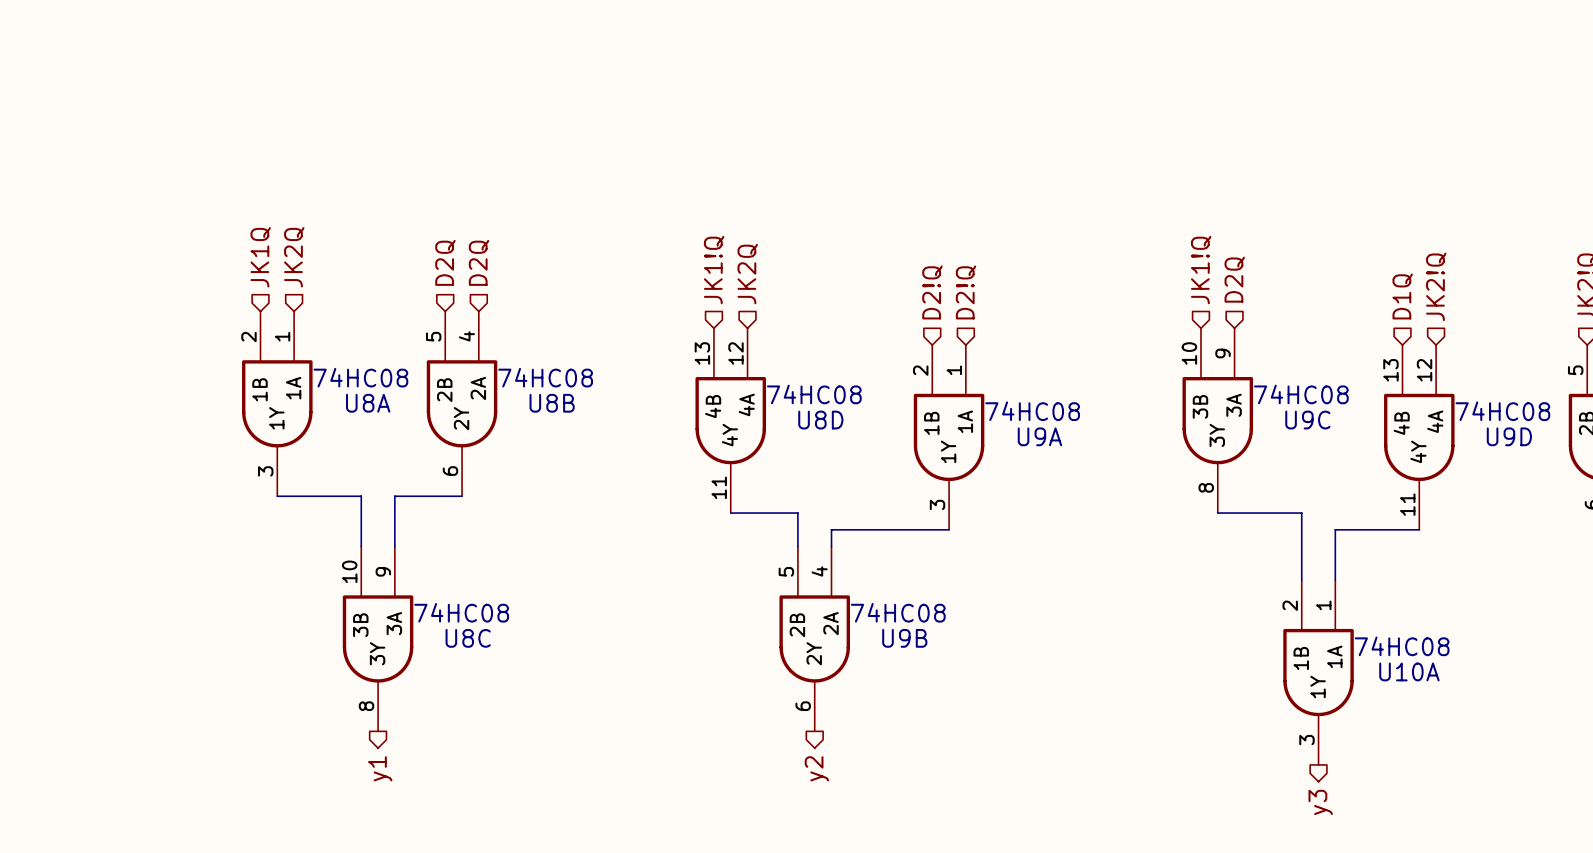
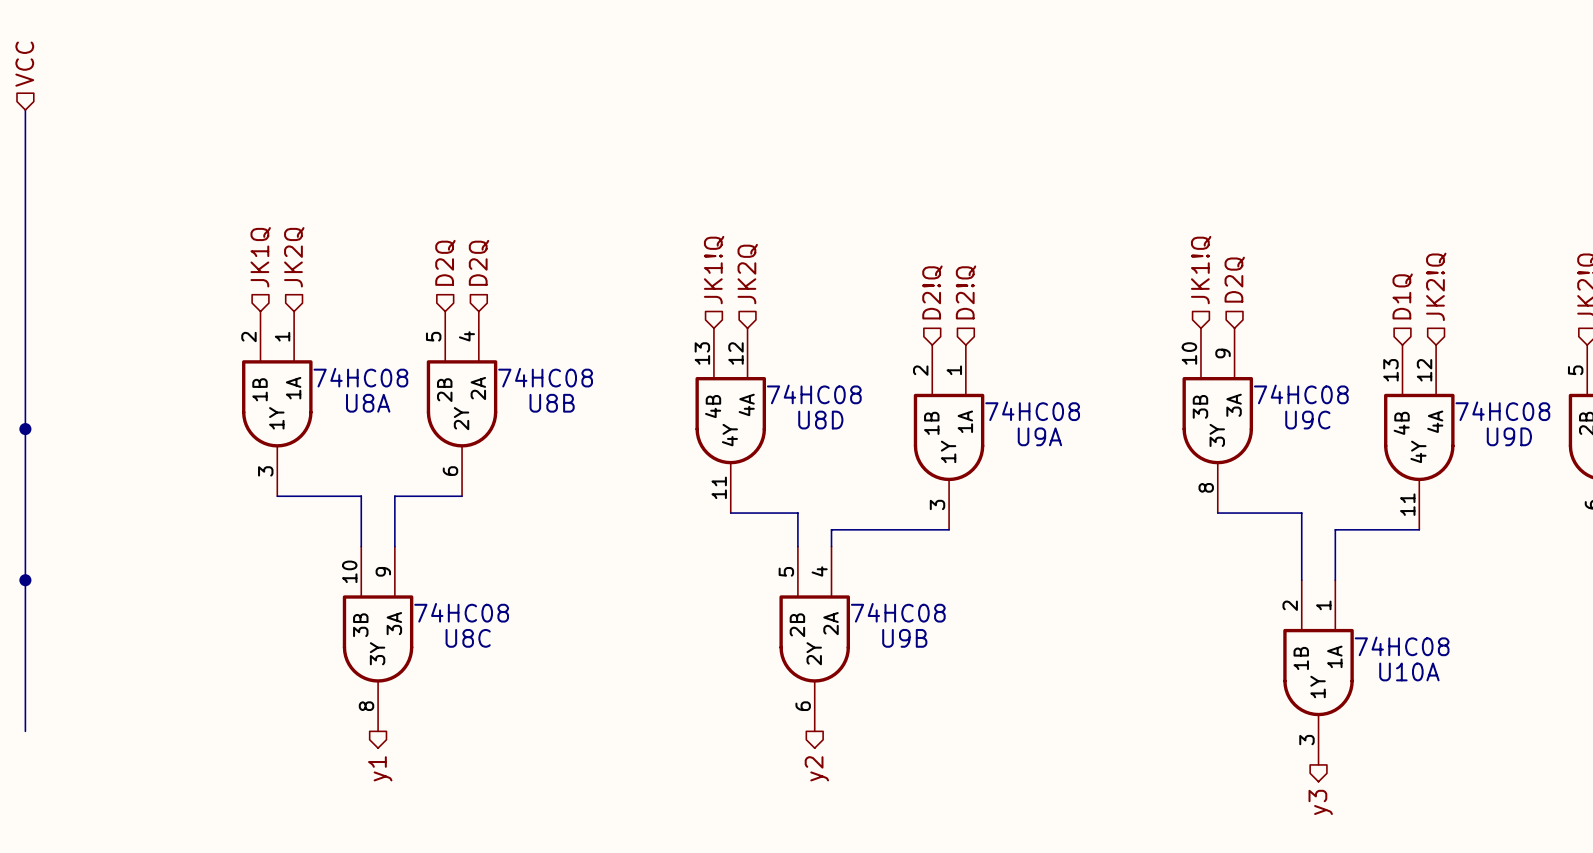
hierarchical label: none -> VCC (24, 64)
wire: none -> (25, 109) (25, 731)
junction: none -> (25, 429)
junction: none -> (25, 580)

